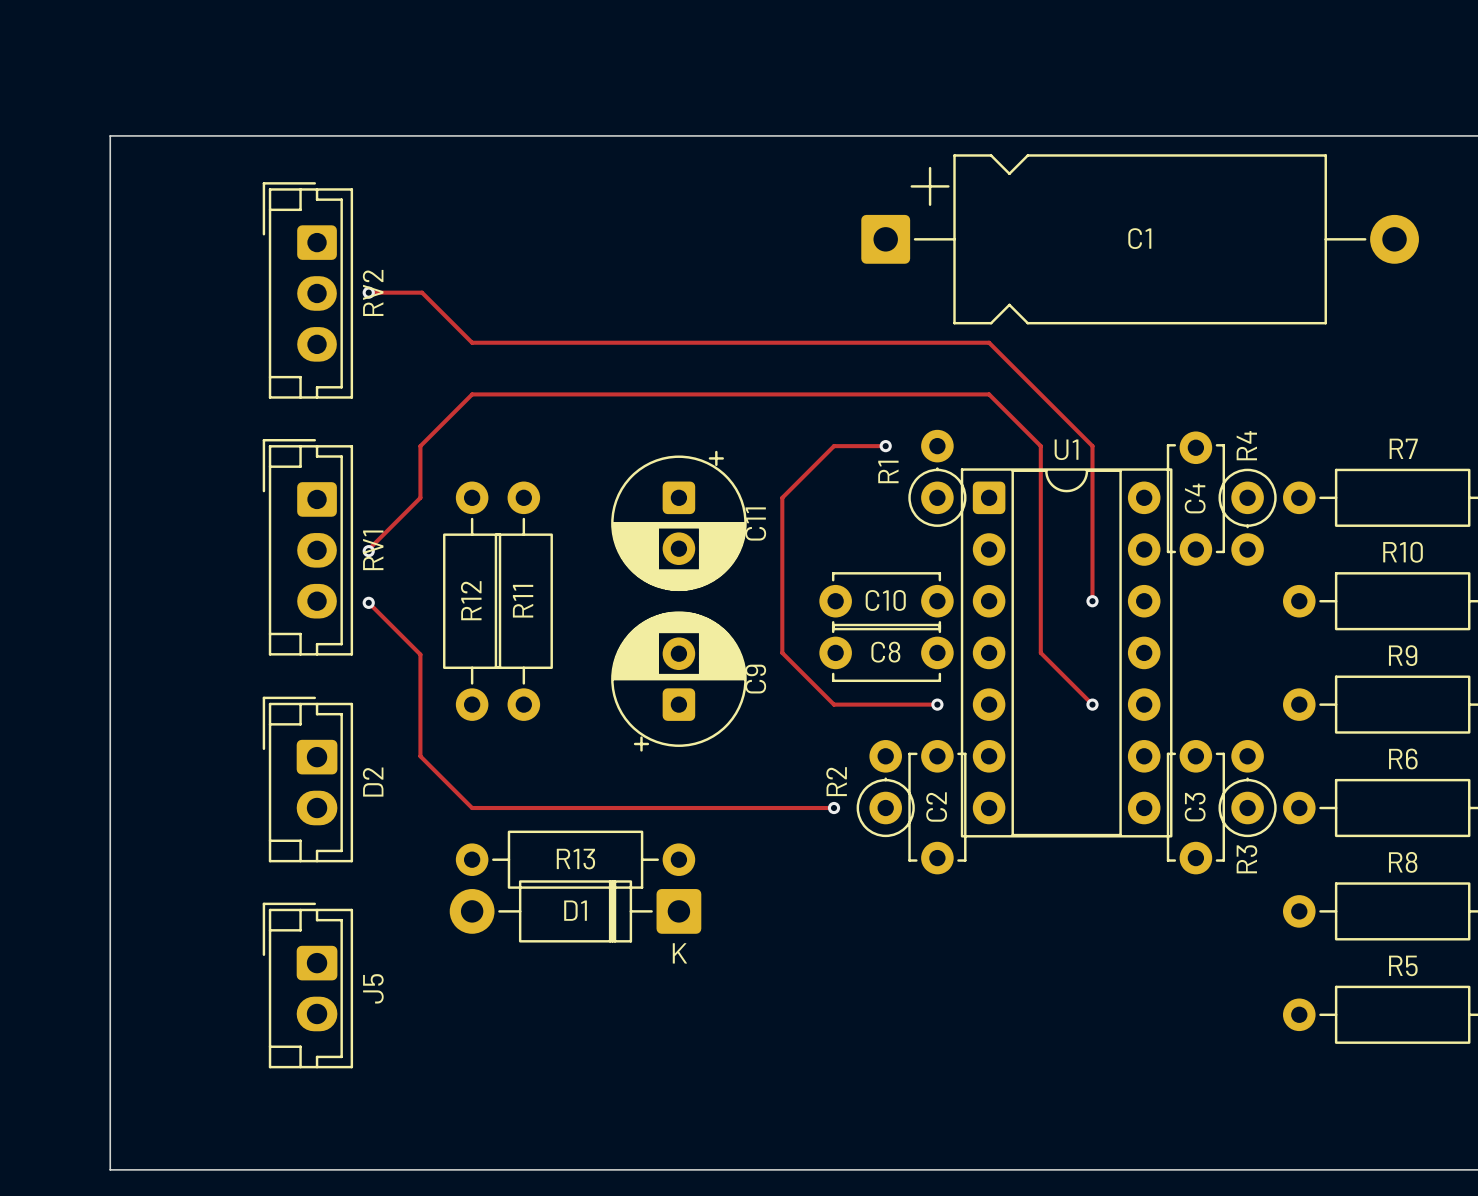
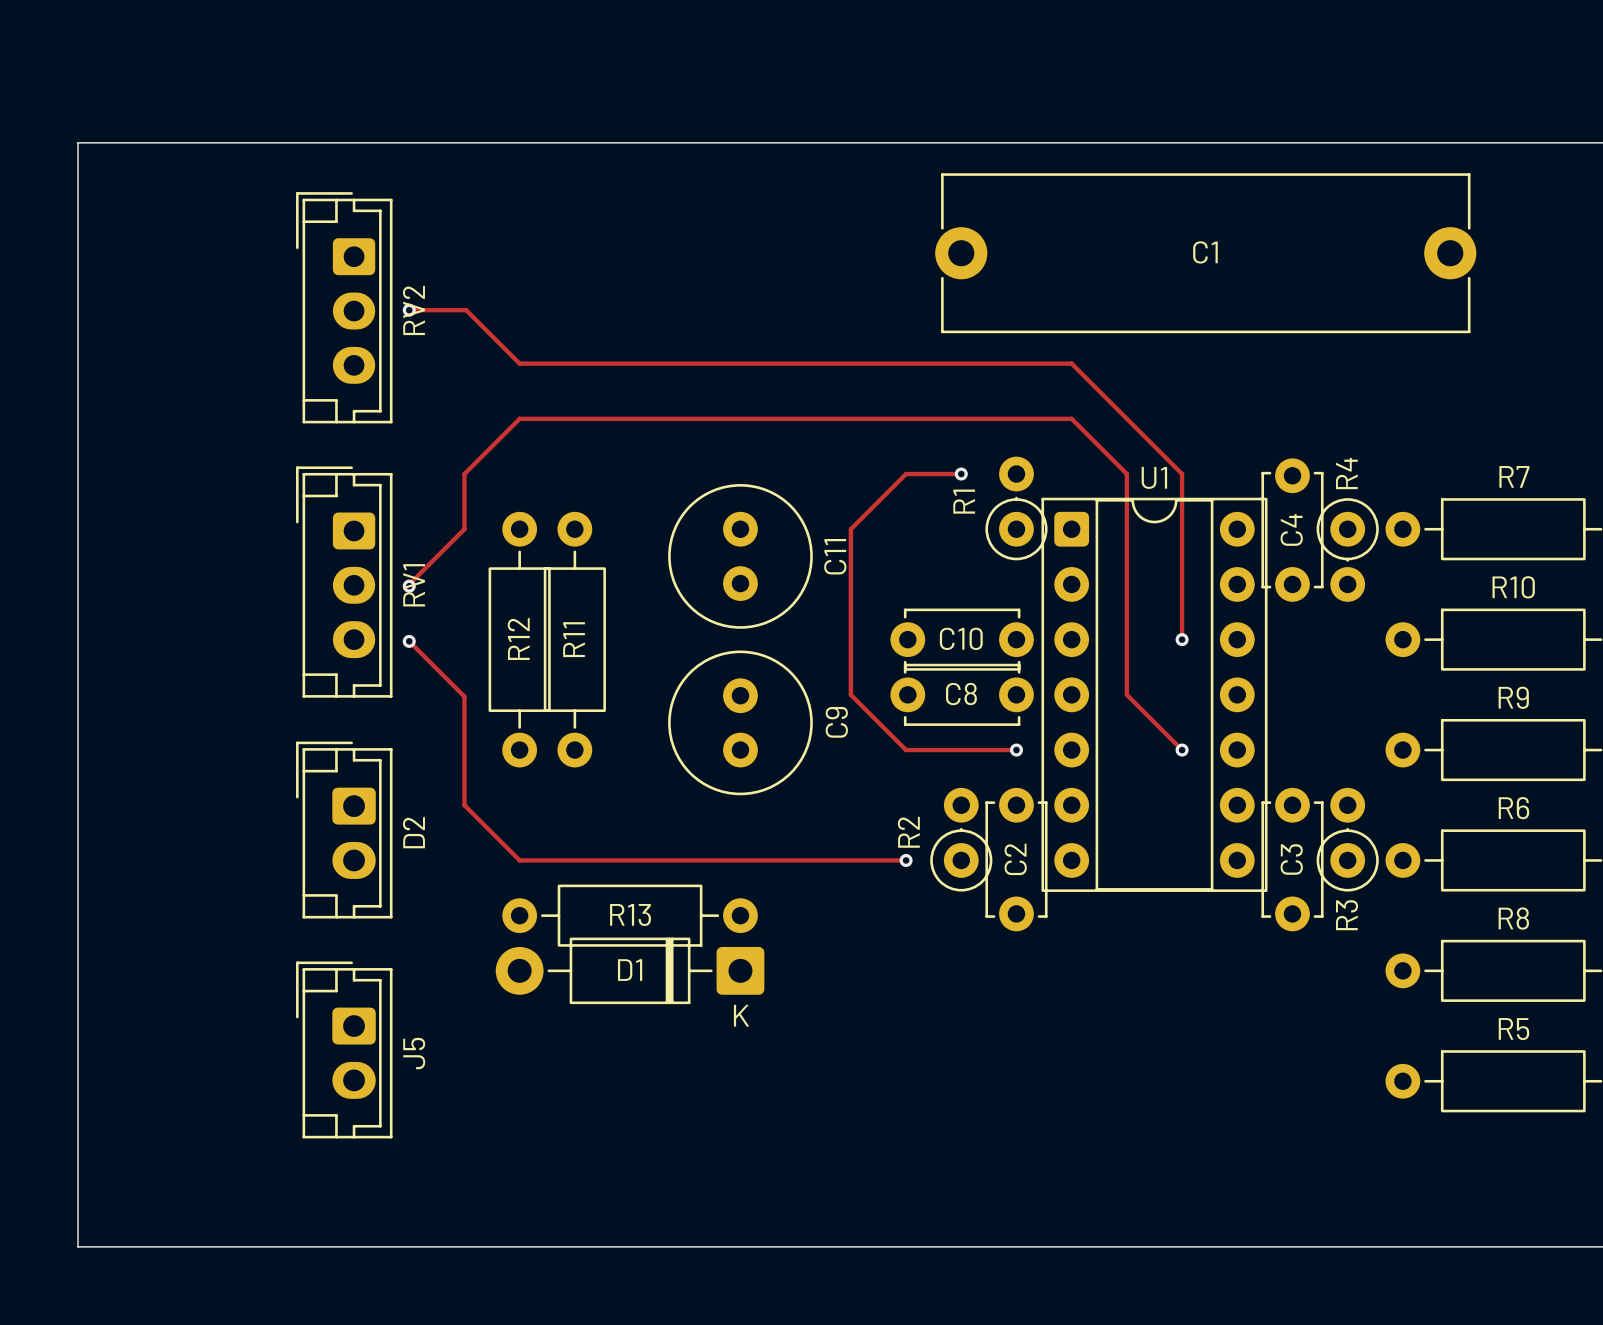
board edge: (110, 135) (110, 1169) -> (133, 142) (78, 142) (78, 1246) (133, 1246)
C1 footprint: [861, 154, 1419, 325] -> [935, 173, 1477, 334]
C11 footprint: [611, 450, 747, 592] -> [668, 484, 813, 629]
C9 footprint: [611, 611, 747, 752] -> [668, 650, 813, 796]

